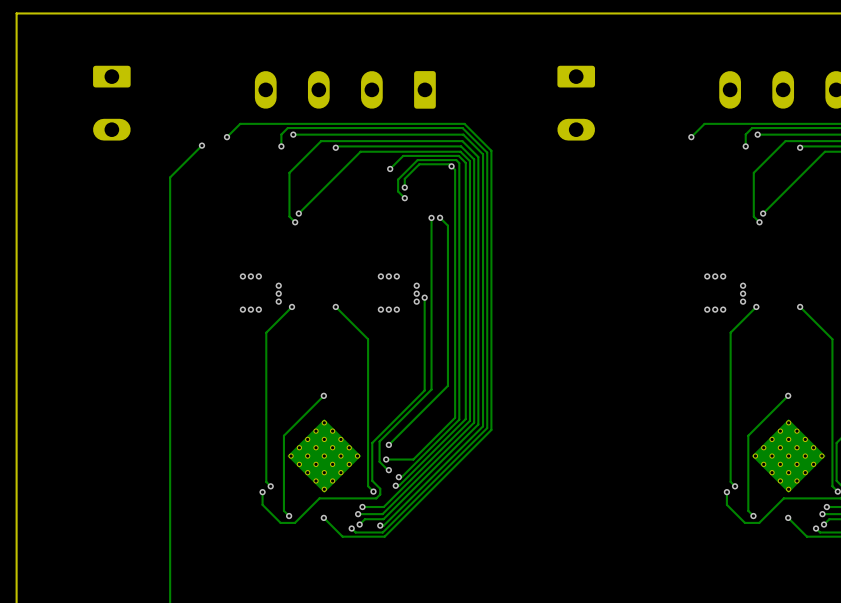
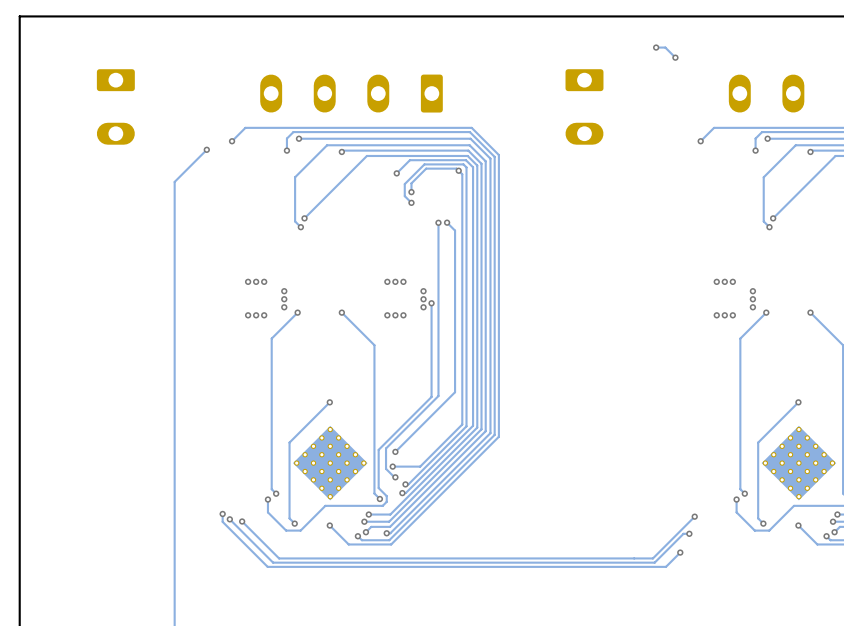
track: none -> (656, 47) (665, 47) (675, 57)
via: none -> (656, 47)
via: none -> (675, 57)
track: none -> (222, 513) (222, 521) (267, 566) (665, 566) (680, 552)
via: none -> (222, 513)
track: none -> (694, 516) (652, 558) (279, 558) (242, 521)
via: none -> (694, 516)
track: none -> (229, 519) (273, 562) (654, 562) (683, 533) (689, 533)
via: none -> (229, 519)
via: none -> (242, 521)
via: none -> (689, 533)
via: none -> (680, 552)

